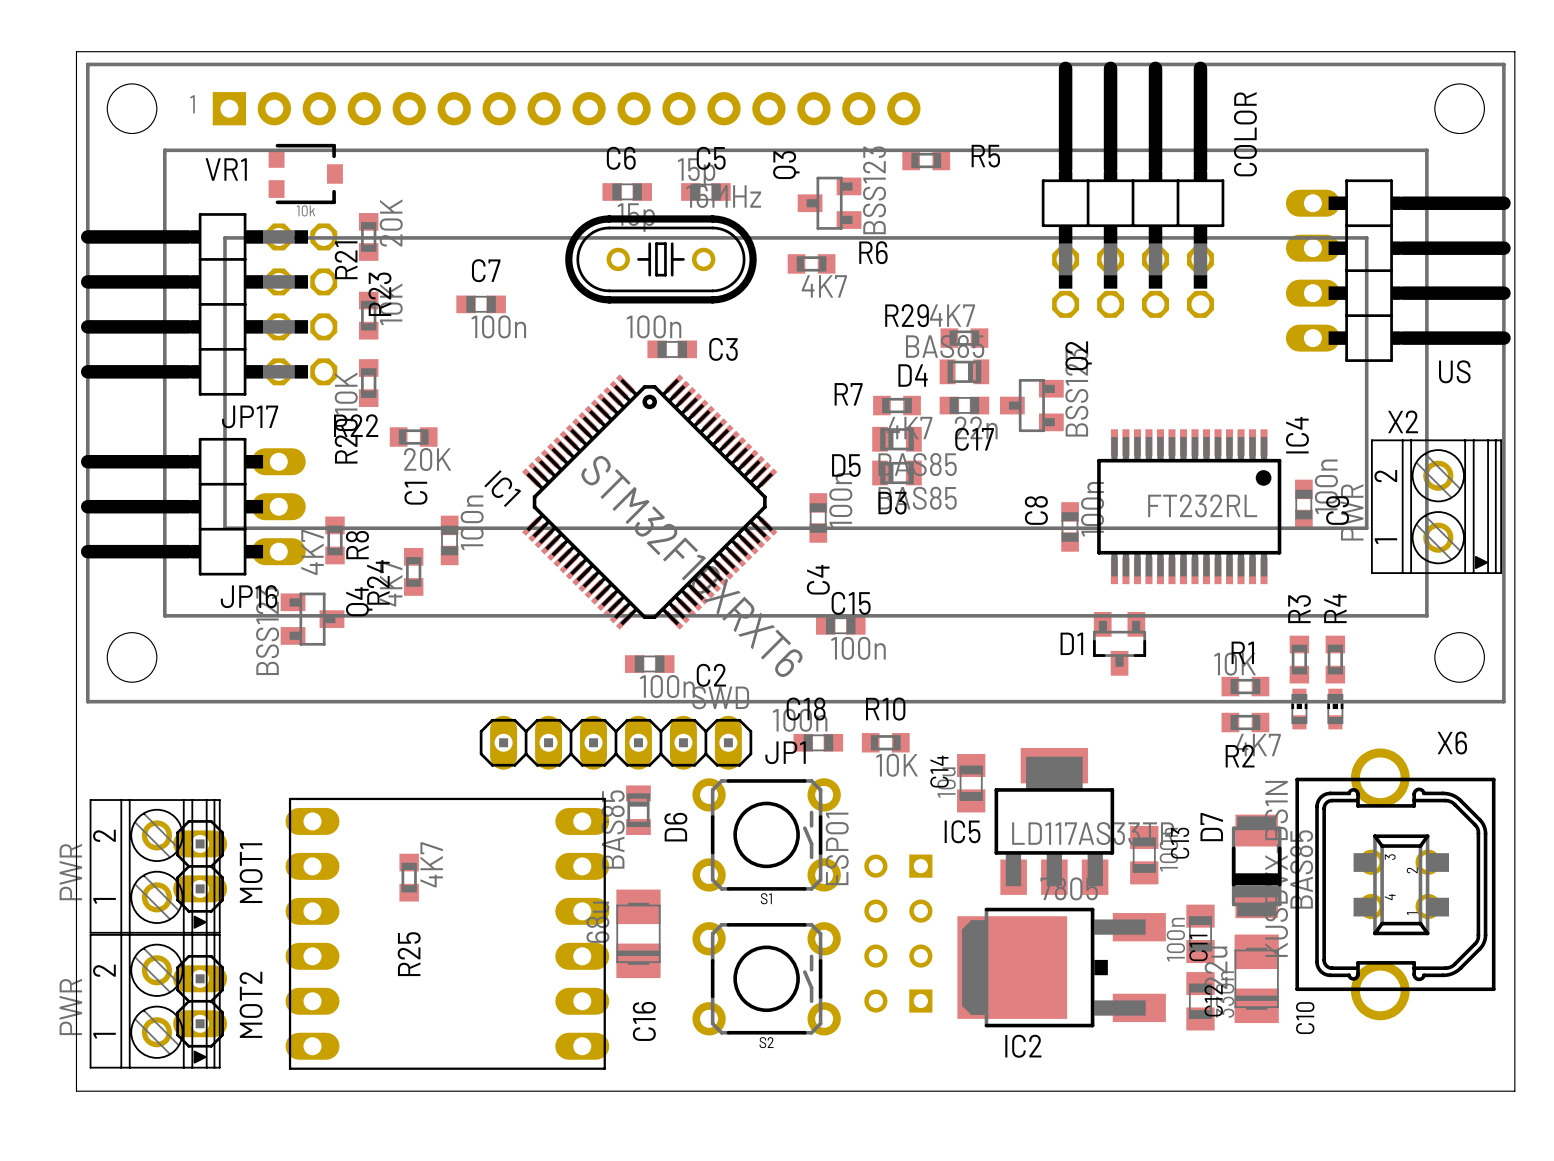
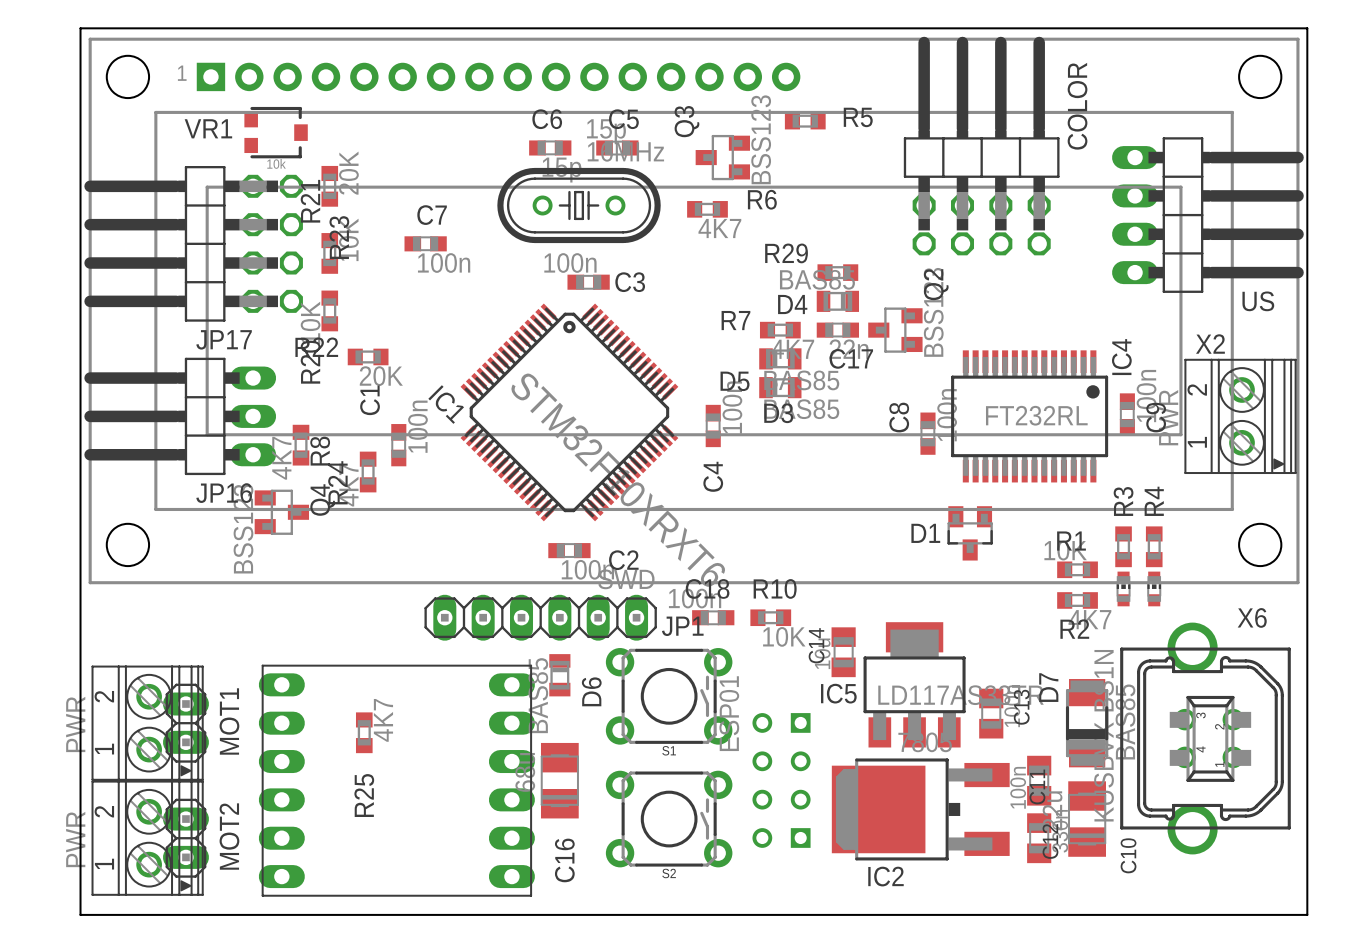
R29 value: 4K7 (952, 315) -> none
C15: 100n (840, 625) -> none

